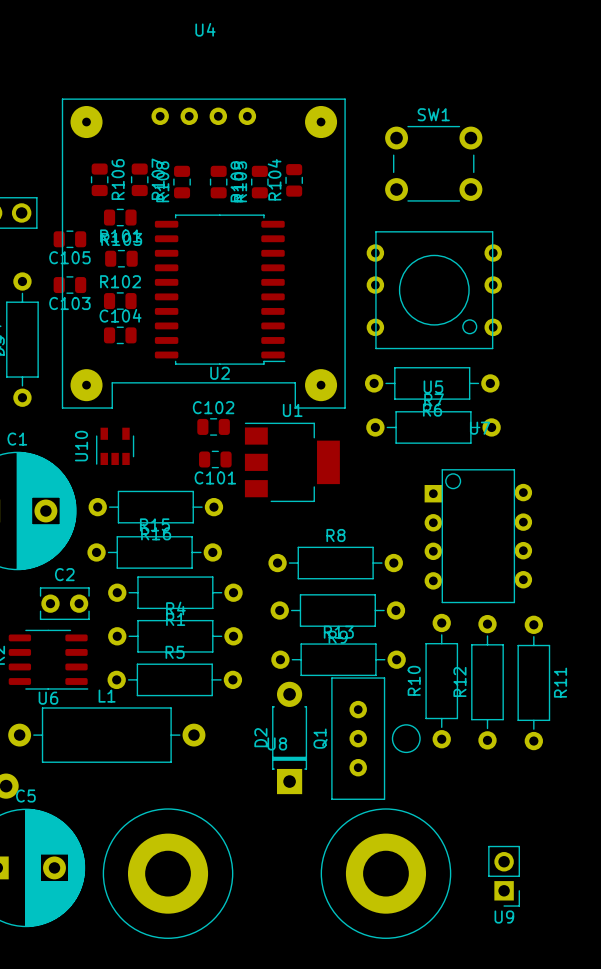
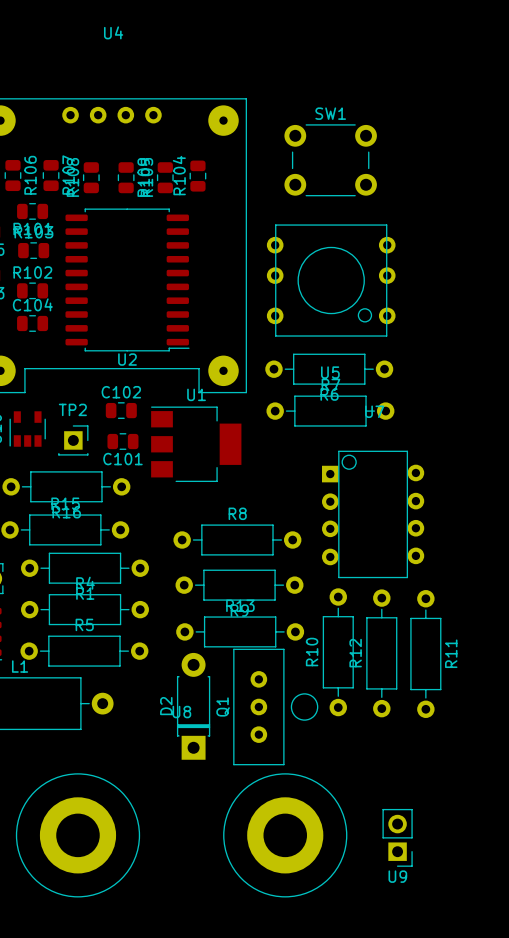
TP2: none -> (73, 440)

